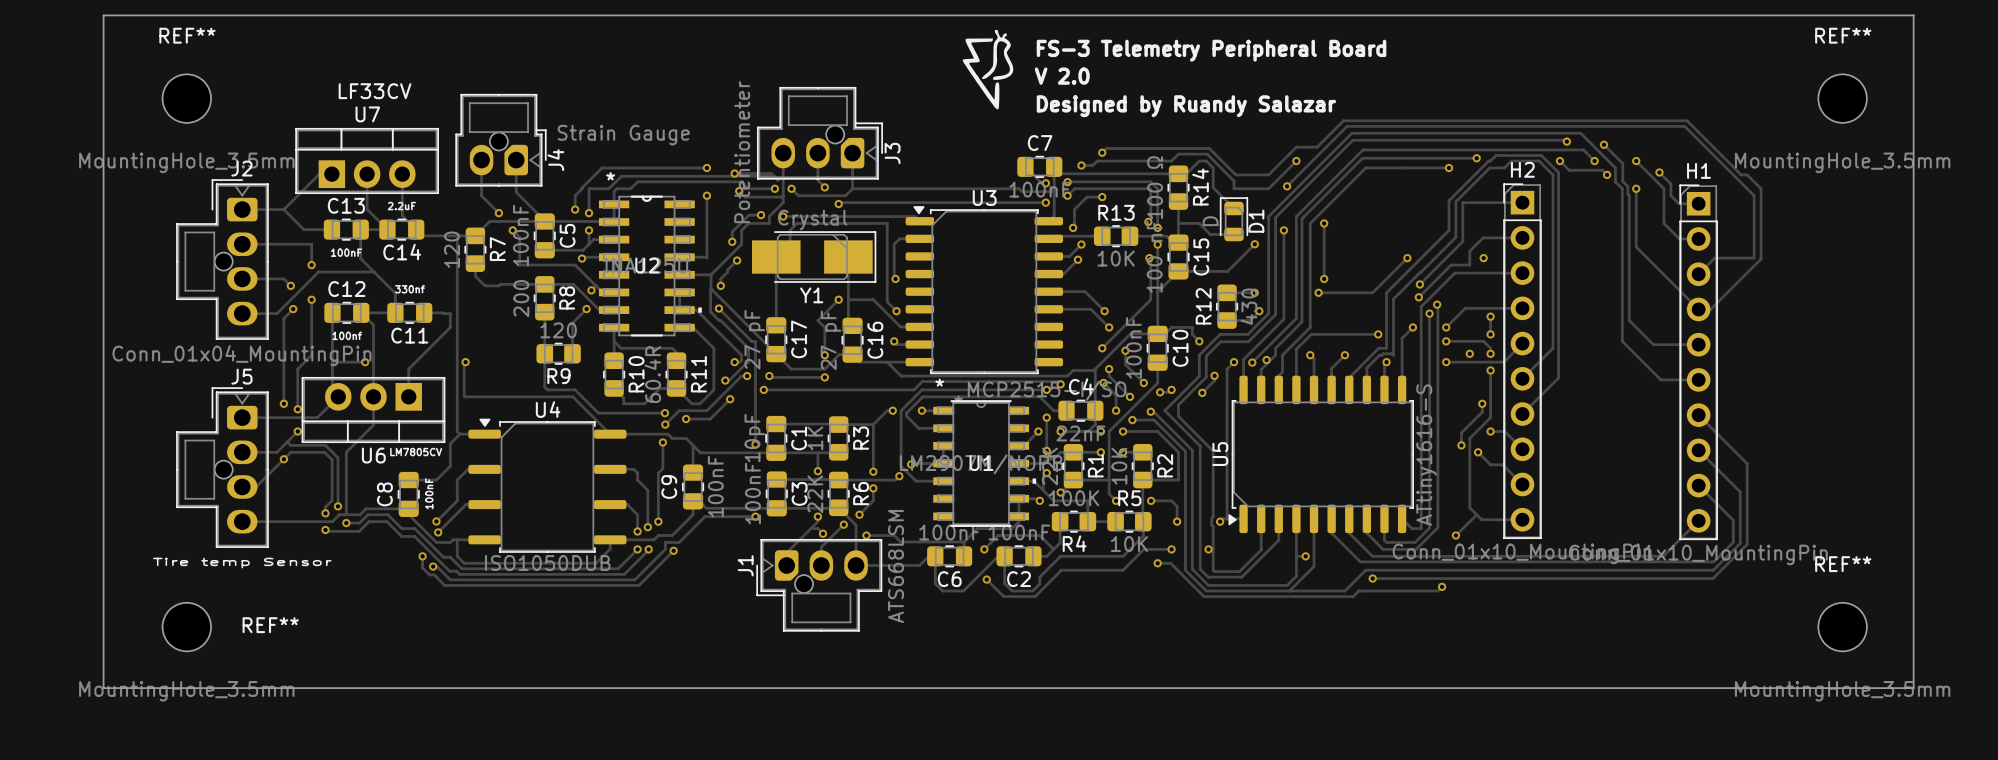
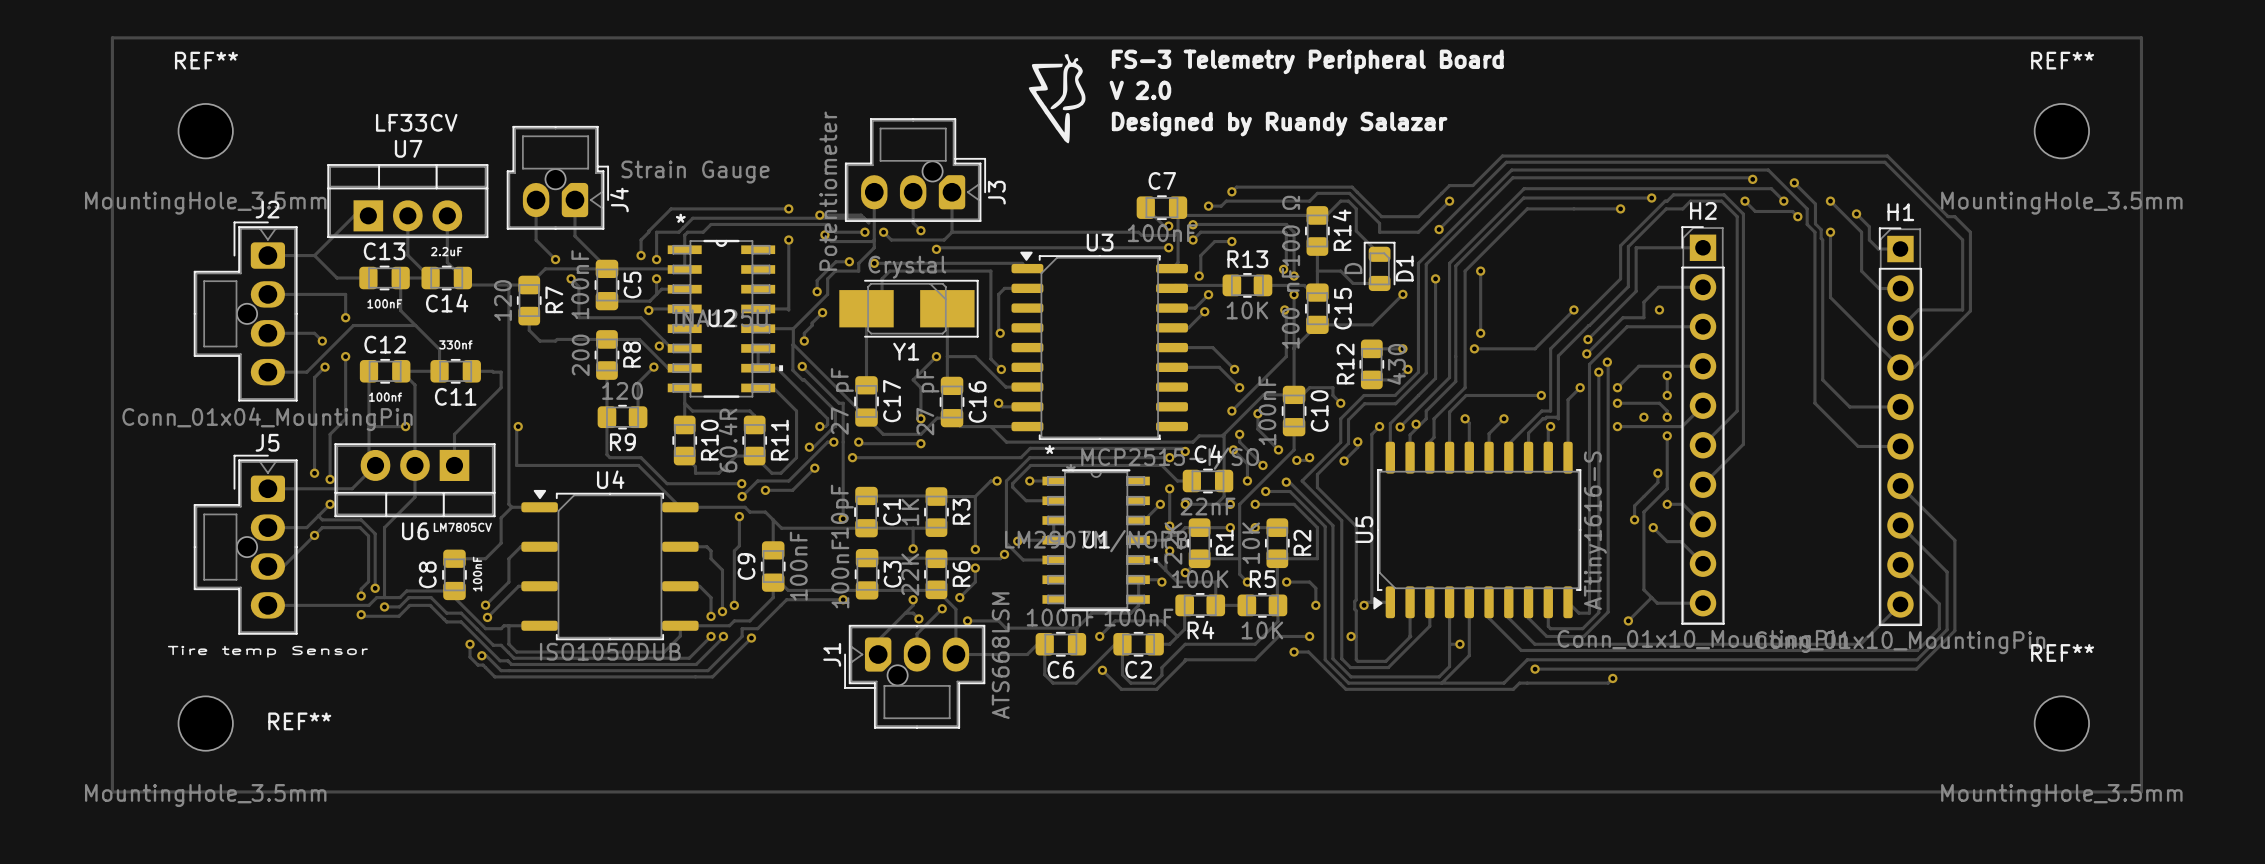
board edge: (103, 15) (1913, 15) (1913, 688) (103, 688) (103, 15) -> none
track: none -> (112, 37) (2141, 37) (2141, 791) (112, 791) (112, 37)
text position: FS-3 Telemetry Peripheral Board (1211, 50) -> FS-3 Telemetry Peripheral Board (1307, 61)
drawing position: (987, 69) -> (1057, 98)
text position: V 2.0 (1062, 76) -> V 2.0 (1140, 90)
text position: Designed by Ruandy Salazar (1186, 106) -> Designed by Ruandy Salazar (1279, 124)

